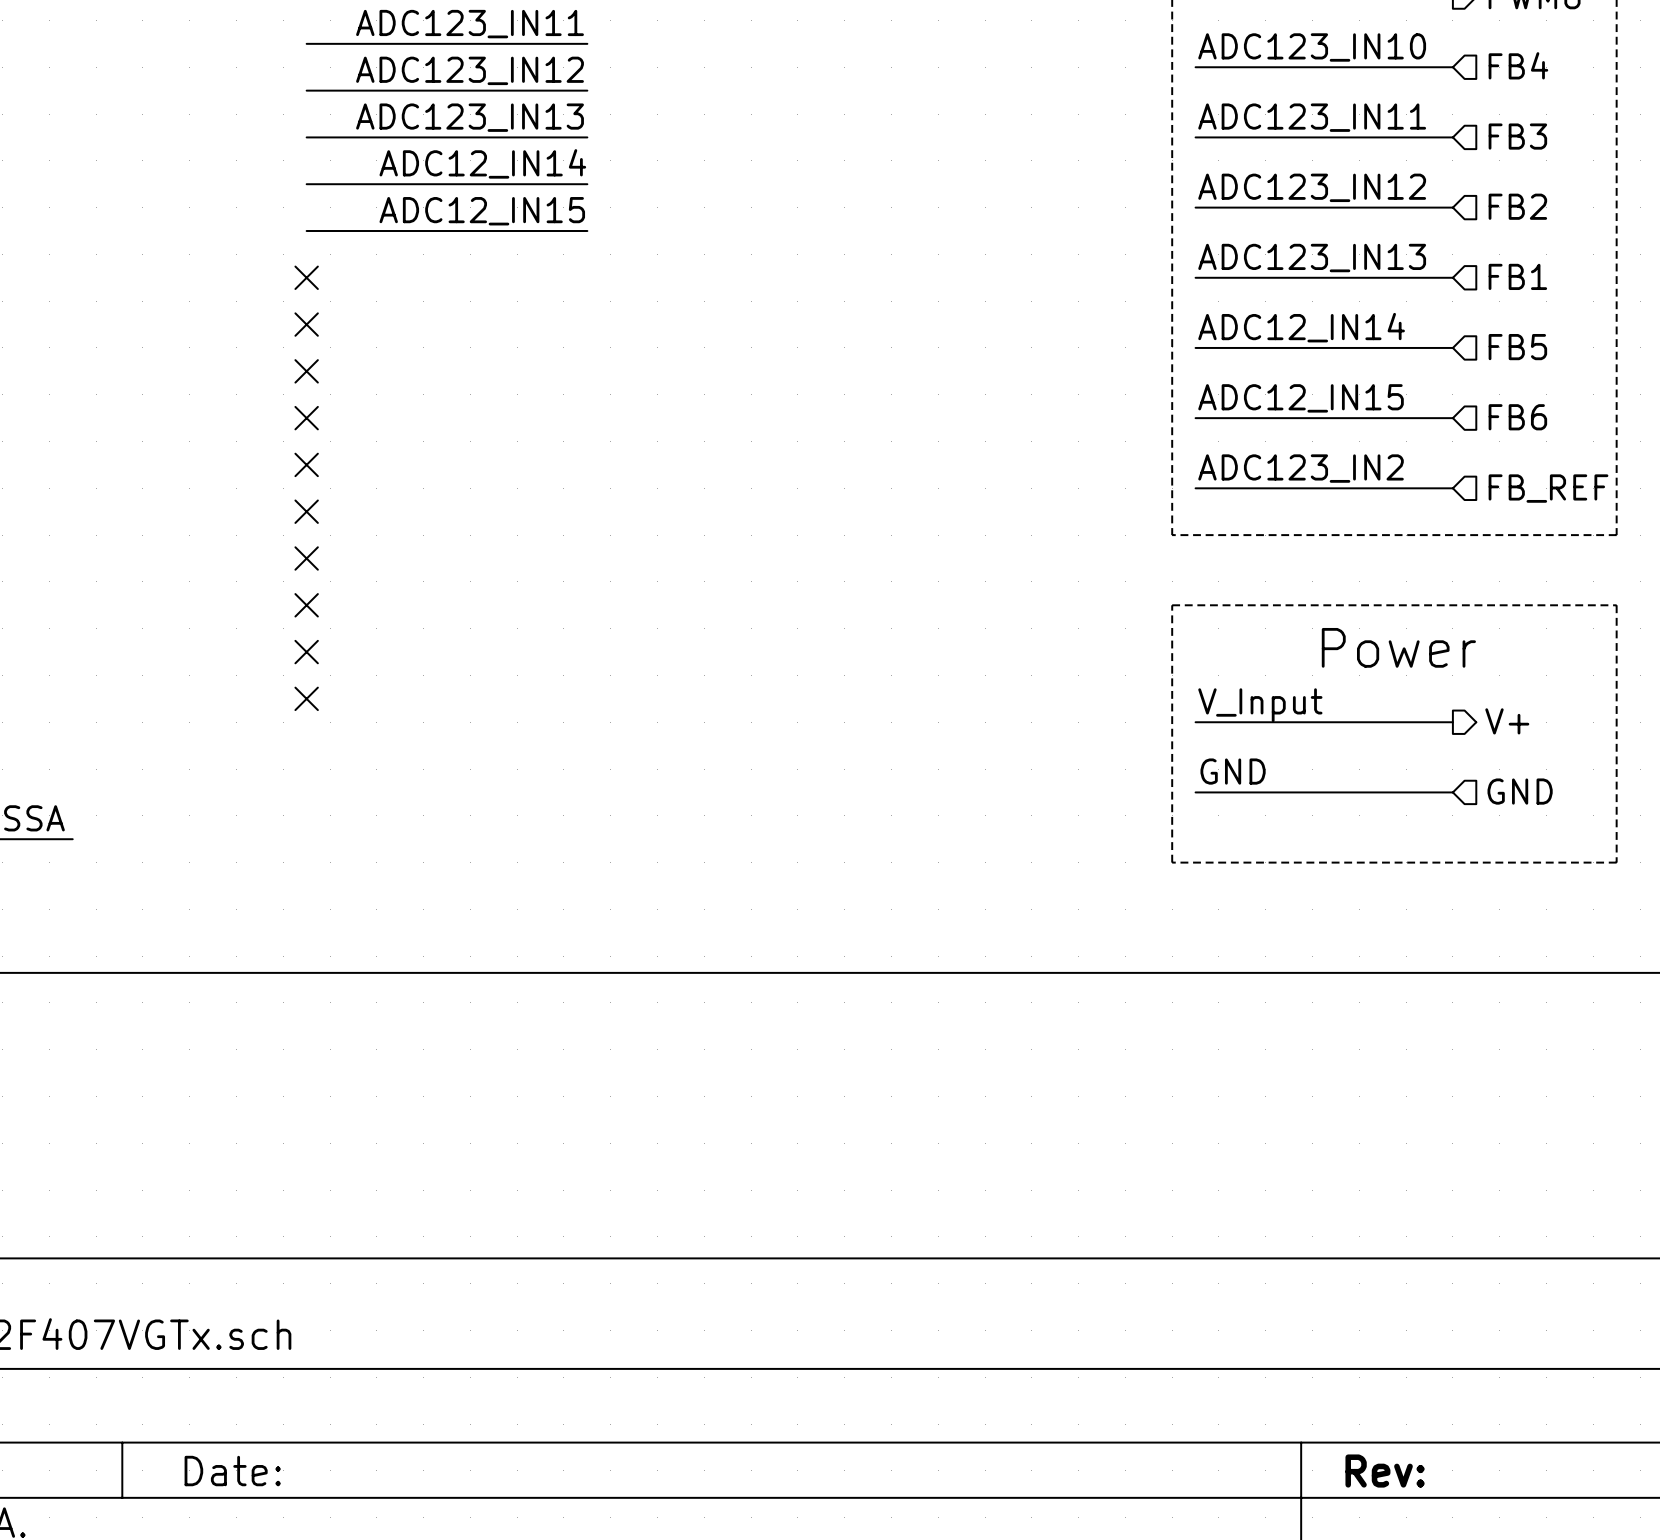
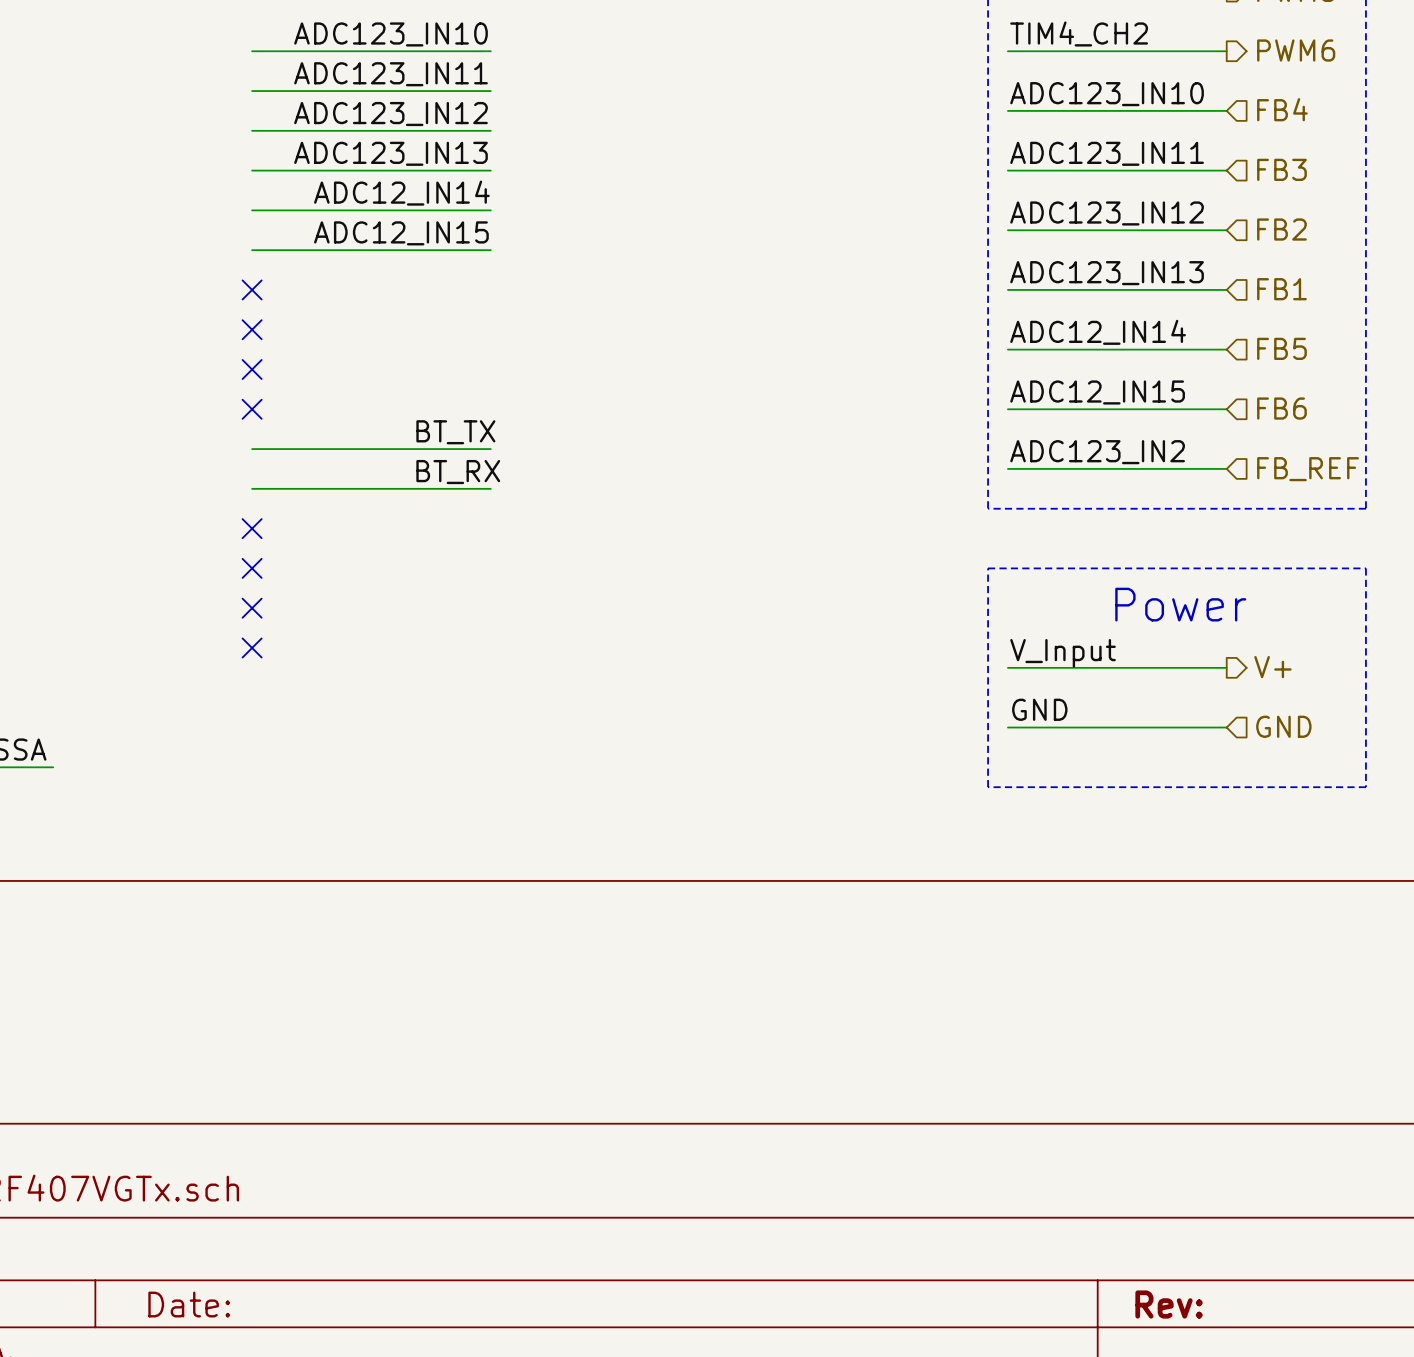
label: none -> BT_TX (455, 432)
wire: none -> (252, 449) (490, 449)
no-connect mark: (306, 464) -> none
label: none -> BT_RX (458, 472)
wire: none -> (252, 488) (490, 488)
no-connect mark: (306, 511) -> none

